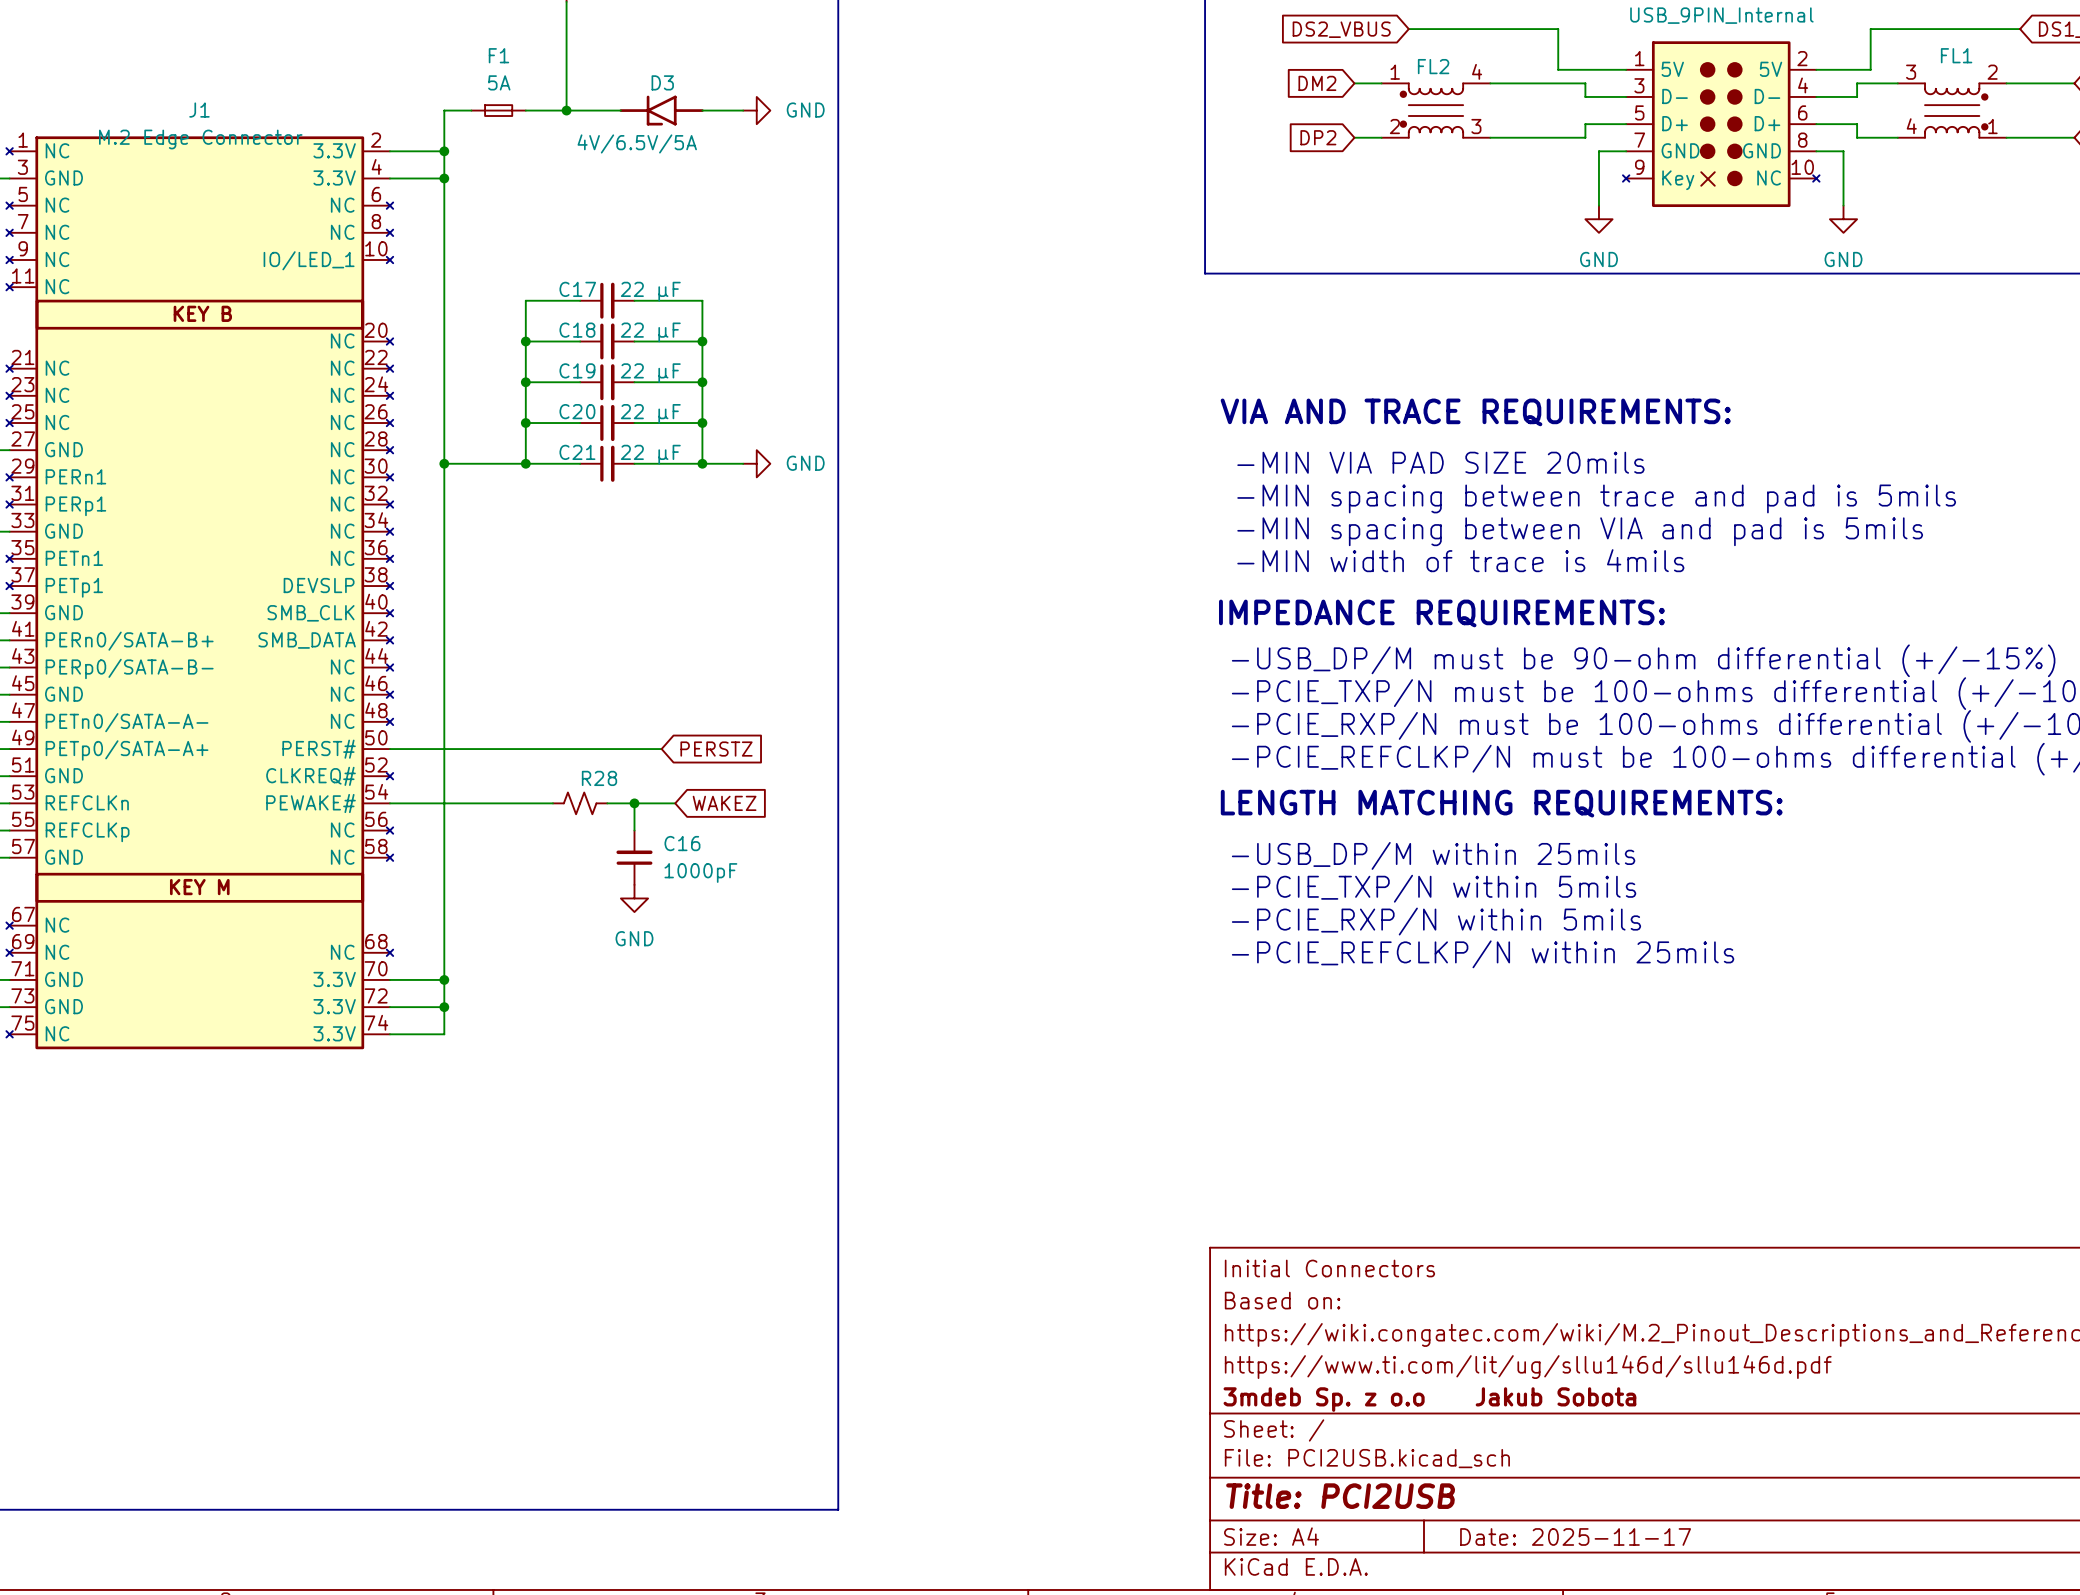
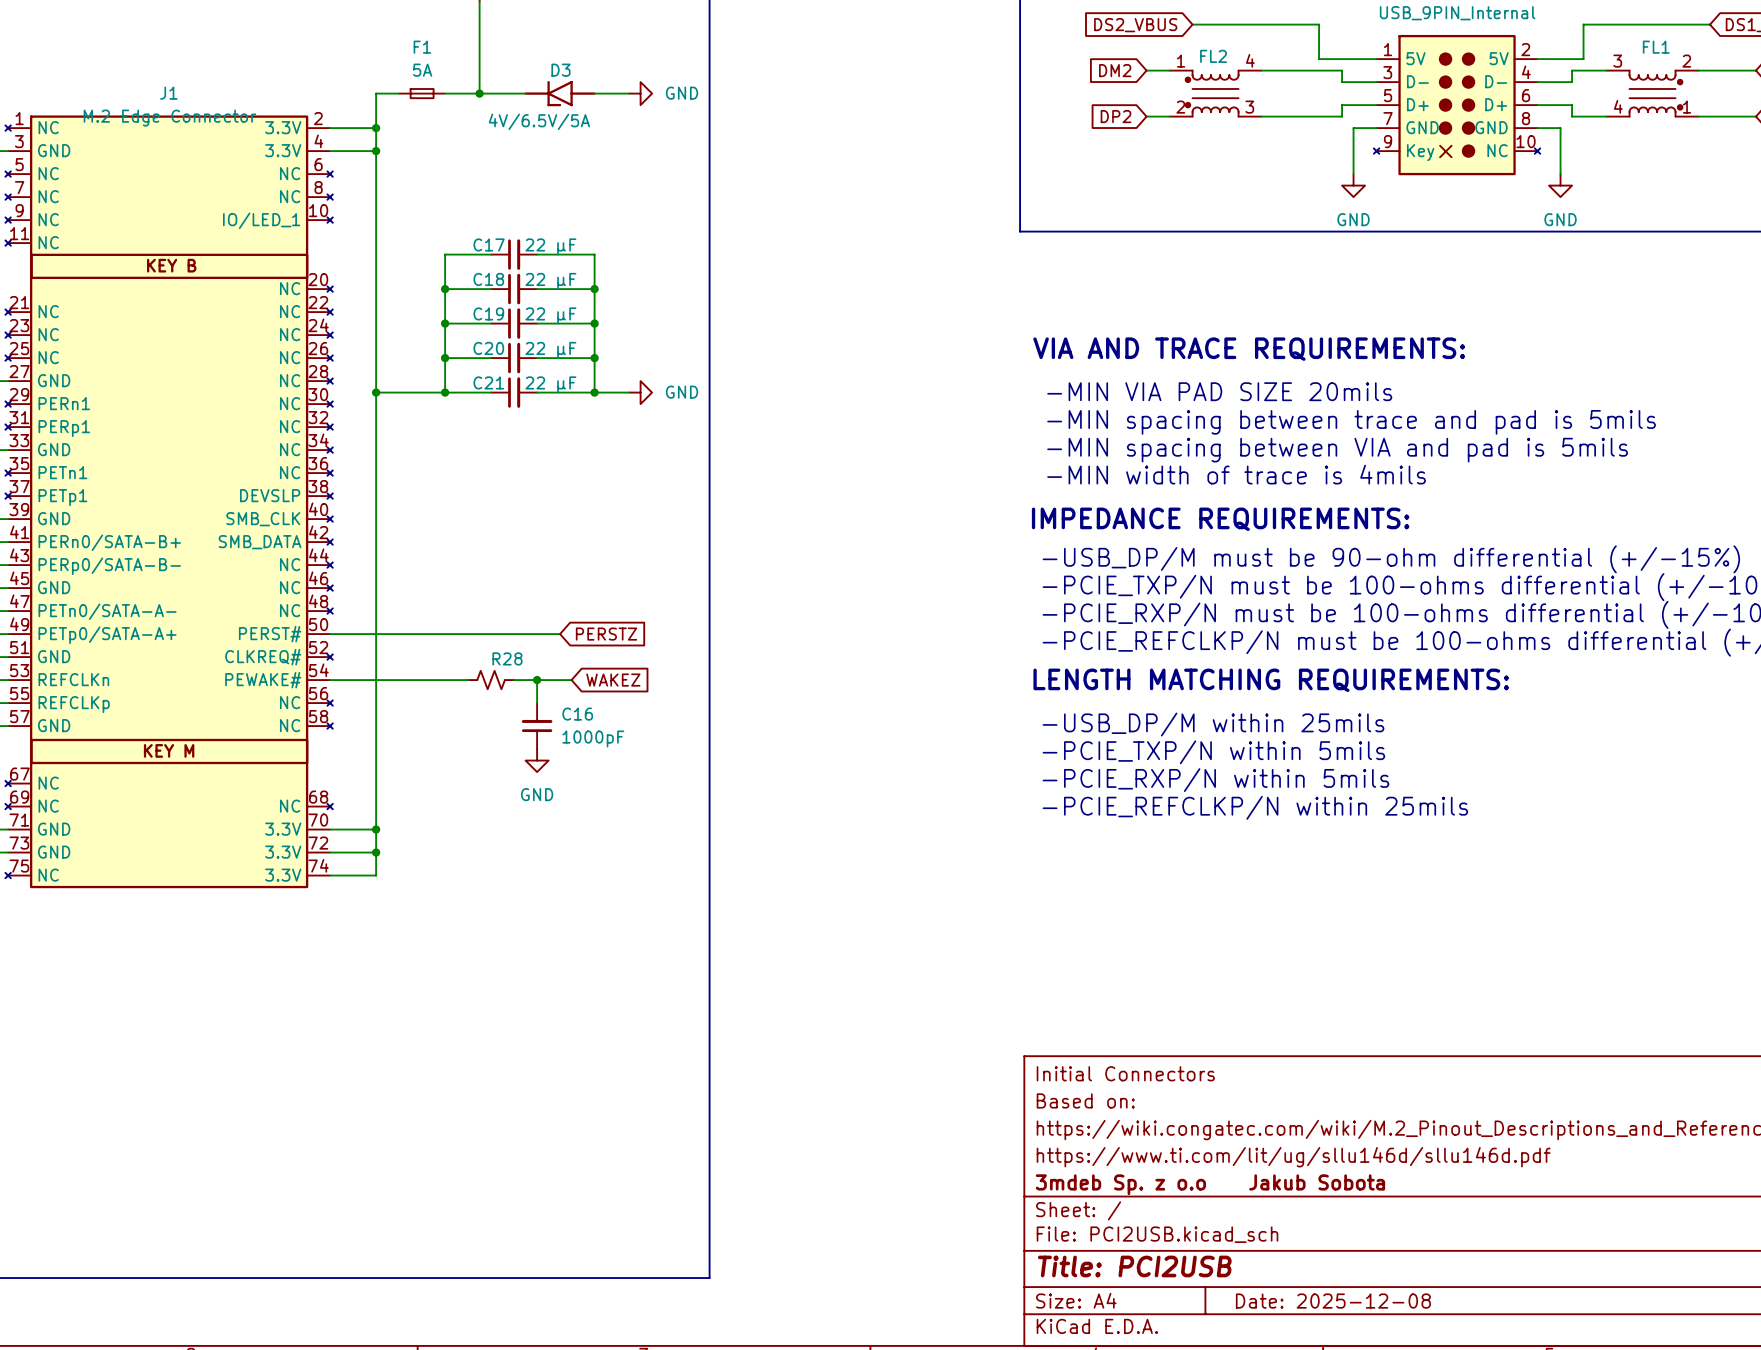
title block: Date: 2025-11-17 (1575, 1536) -> Date: 2025-12-08 (1333, 1301)

